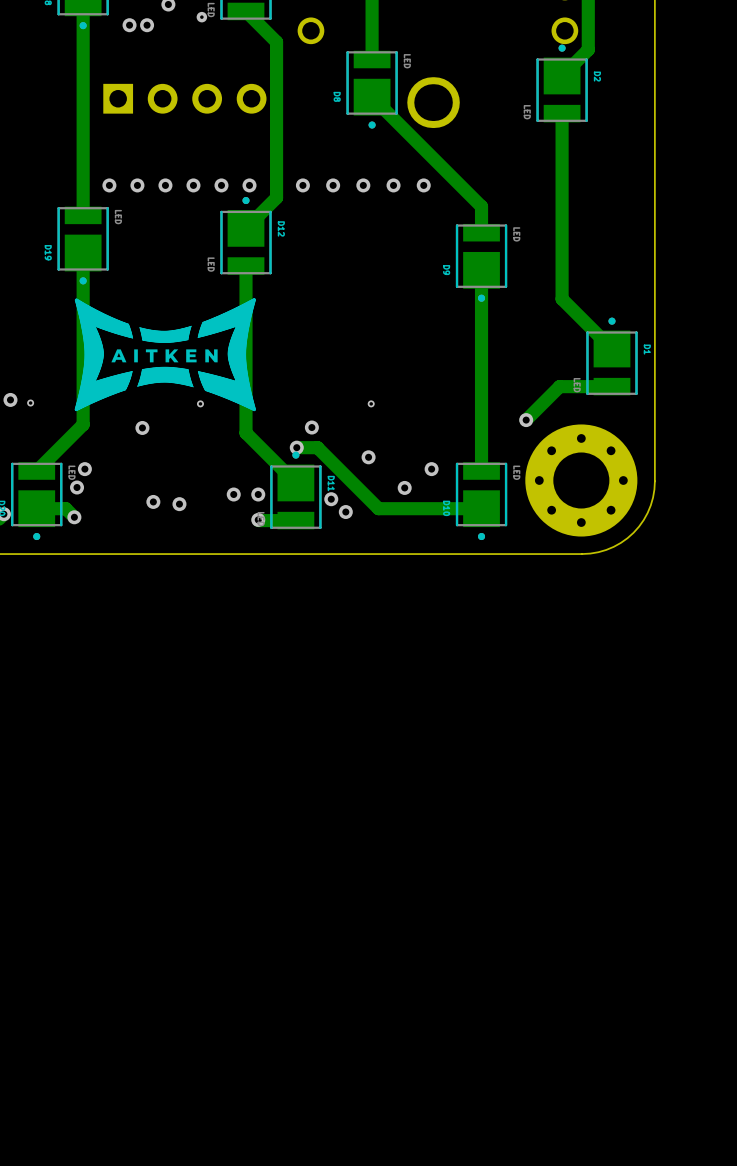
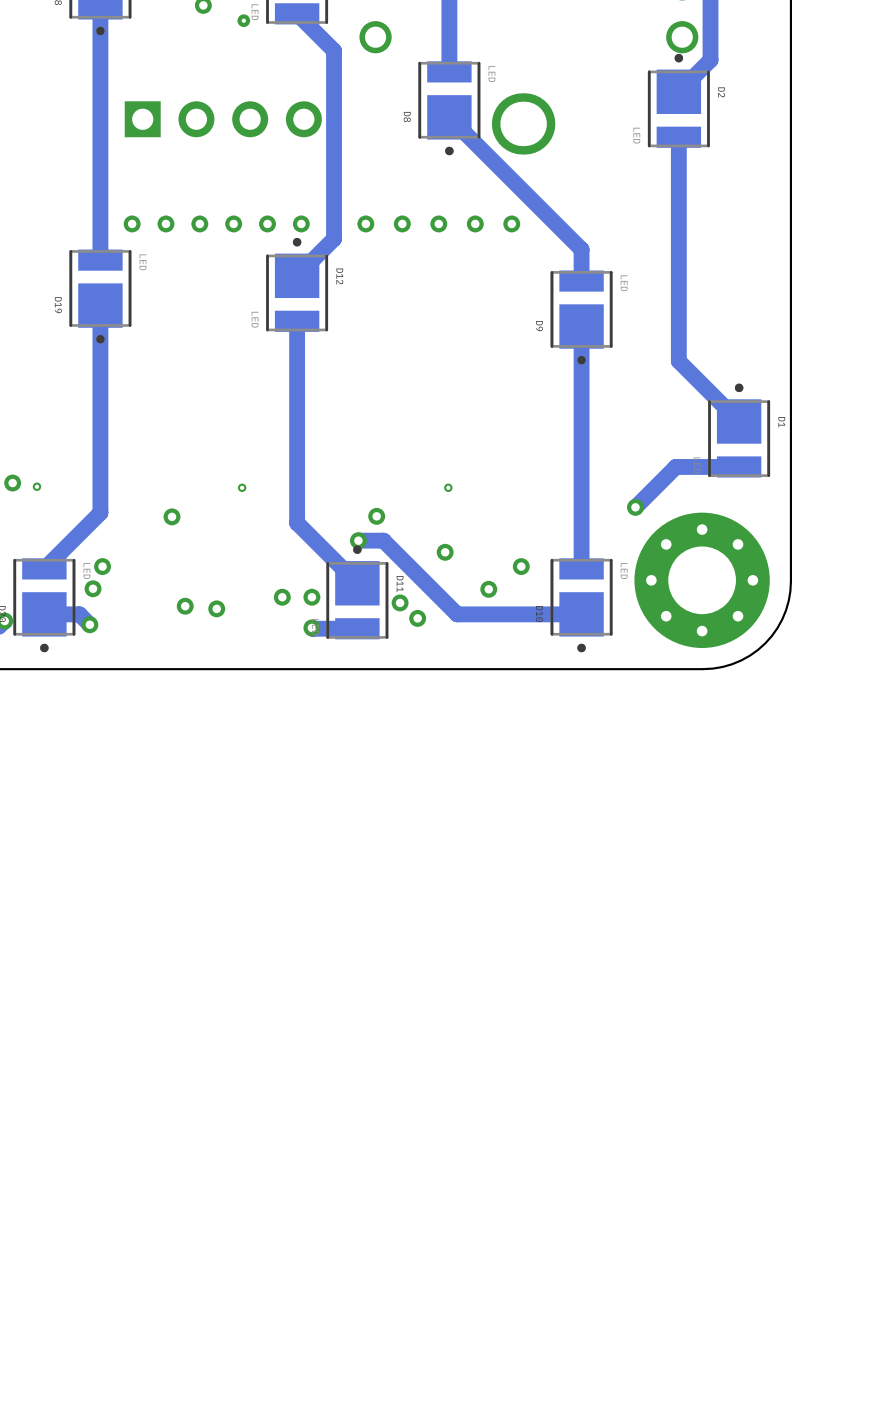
via: (129, 25) -> none
via: (147, 25) -> none
drawing: [74, 298, 256, 412] -> none

